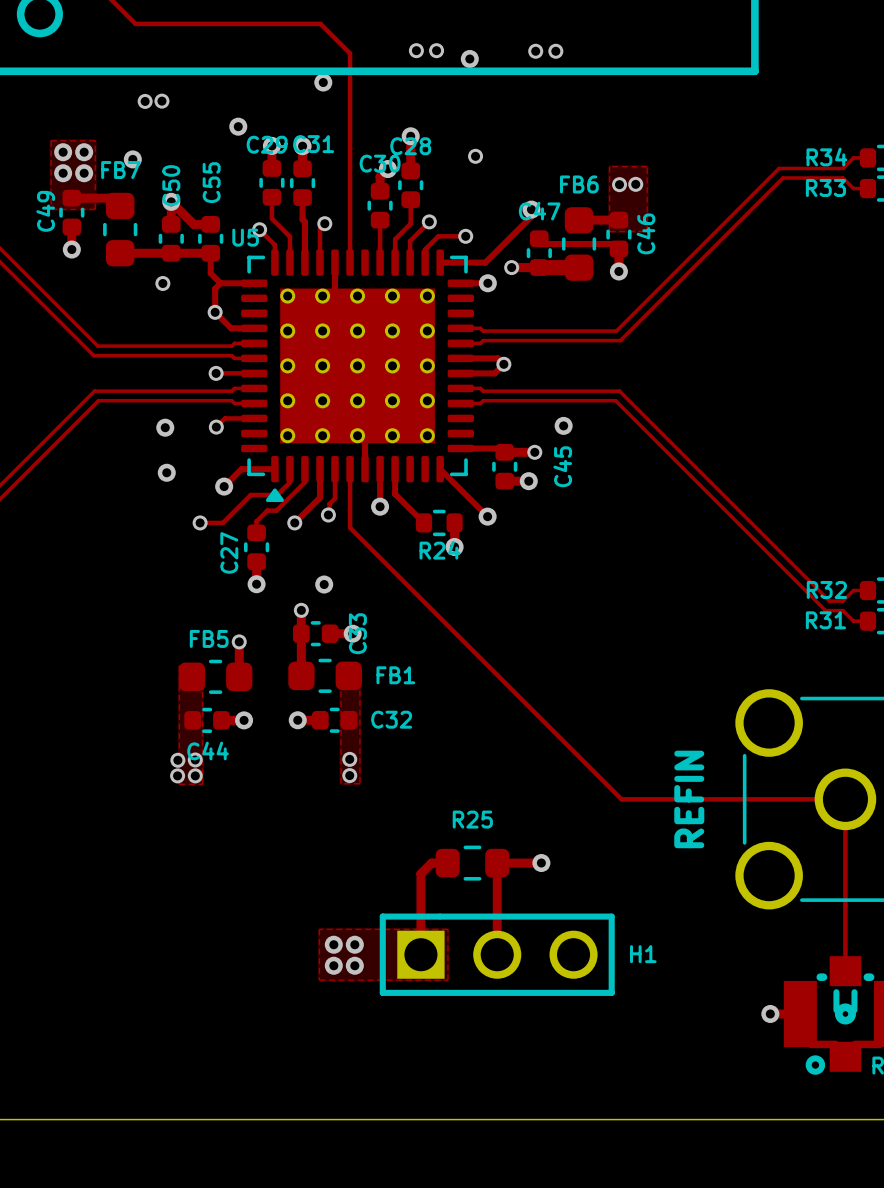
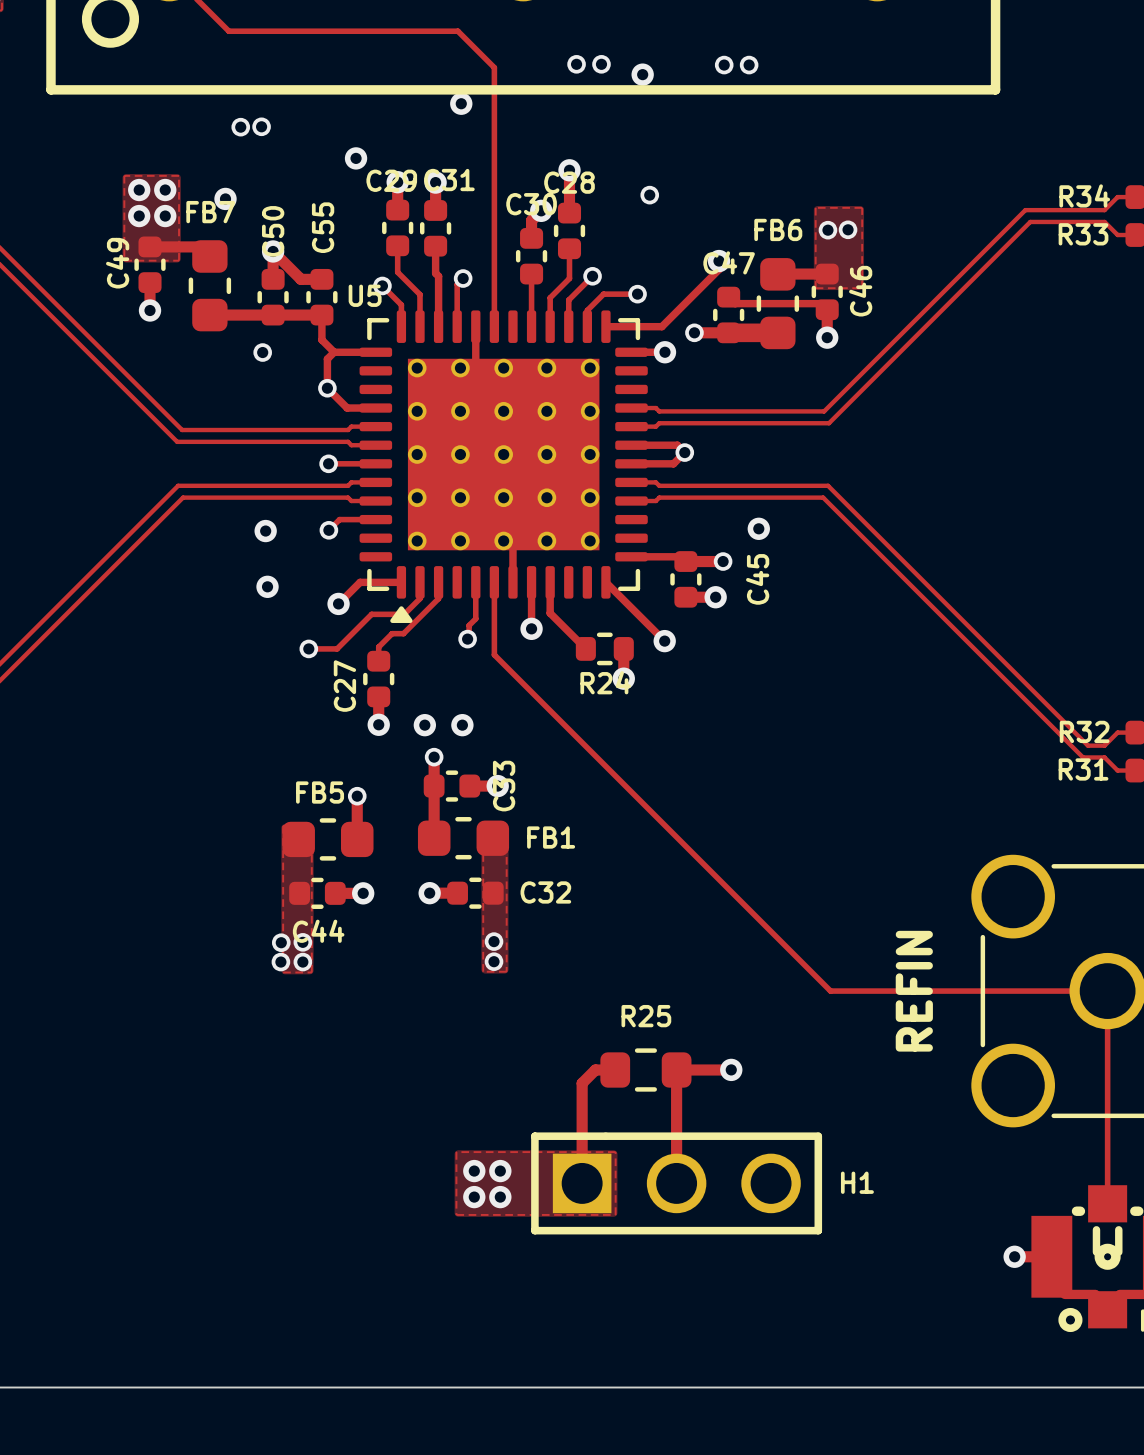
track: (319, 469) (319, 497) (294, 522) -> none
via: (294, 522) -> none
via: none -> (424, 725)

